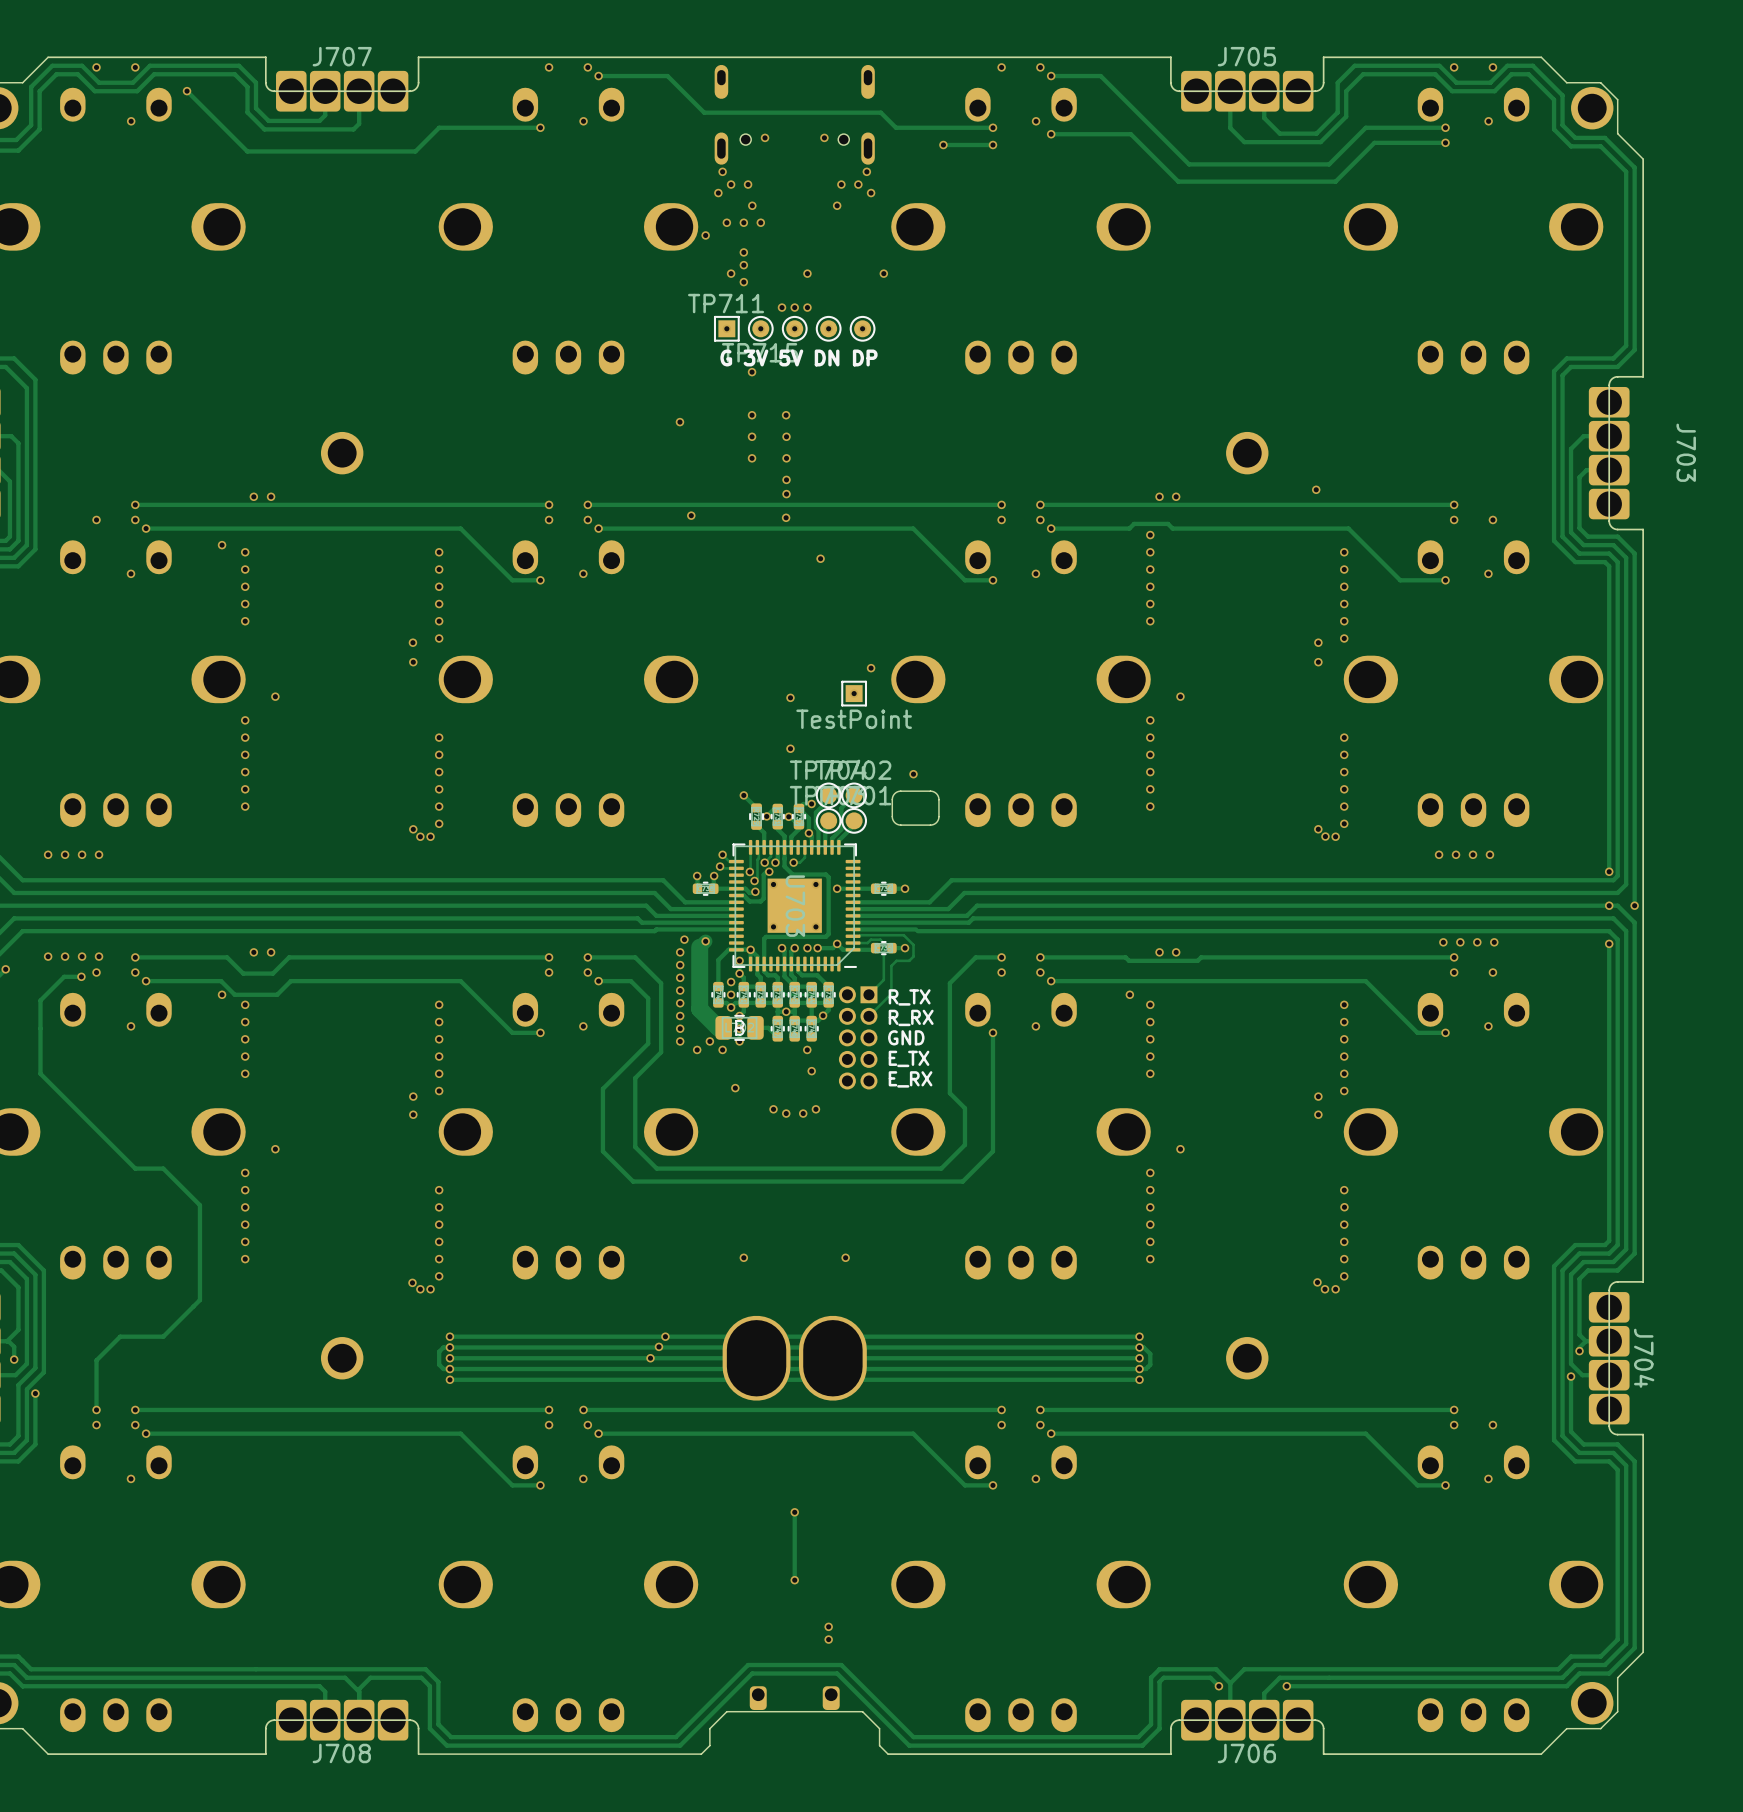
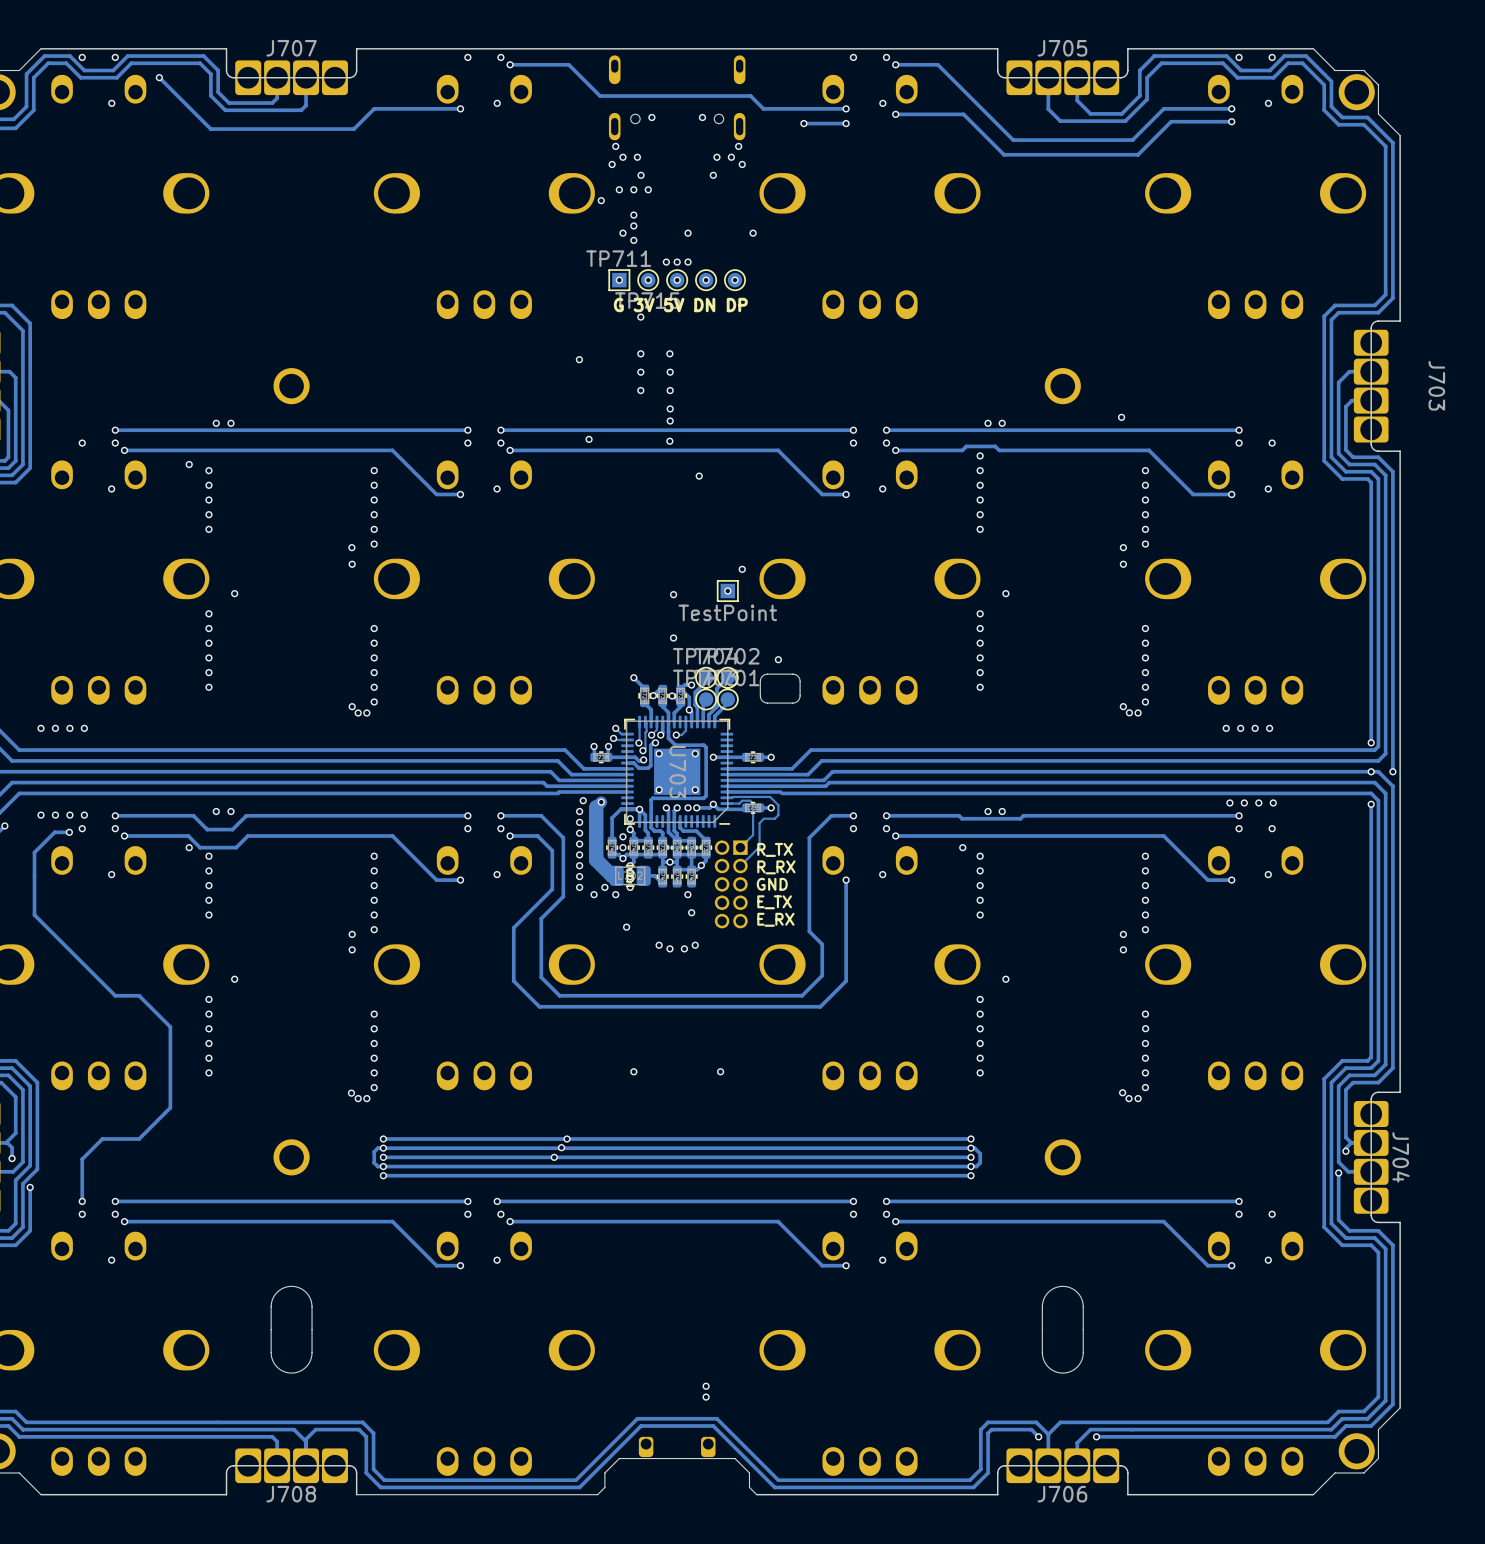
part: (794, 1358) -> none
track: (794, 1512) (794, 1580) -> none
via: (794, 1512) -> none
board edge: none -> (312, 1306) (310, 1360) (306, 1367) (299, 1371) (291, 1373) (283, 1371) (275, 1365) (271, 1355) (272, 1298) (281, 1289) (294, 1286) (301, 1289) (307, 1294) (312, 1306)
board edge: none -> (1083, 1306) (1081, 1360) (1077, 1367) (1070, 1371) (1062, 1373) (1054, 1371) (1046, 1365) (1042, 1355) (1043, 1299) (1053, 1288) (1067, 1286) (1078, 1293) (1083, 1306)
via: (794, 1580) -> none

